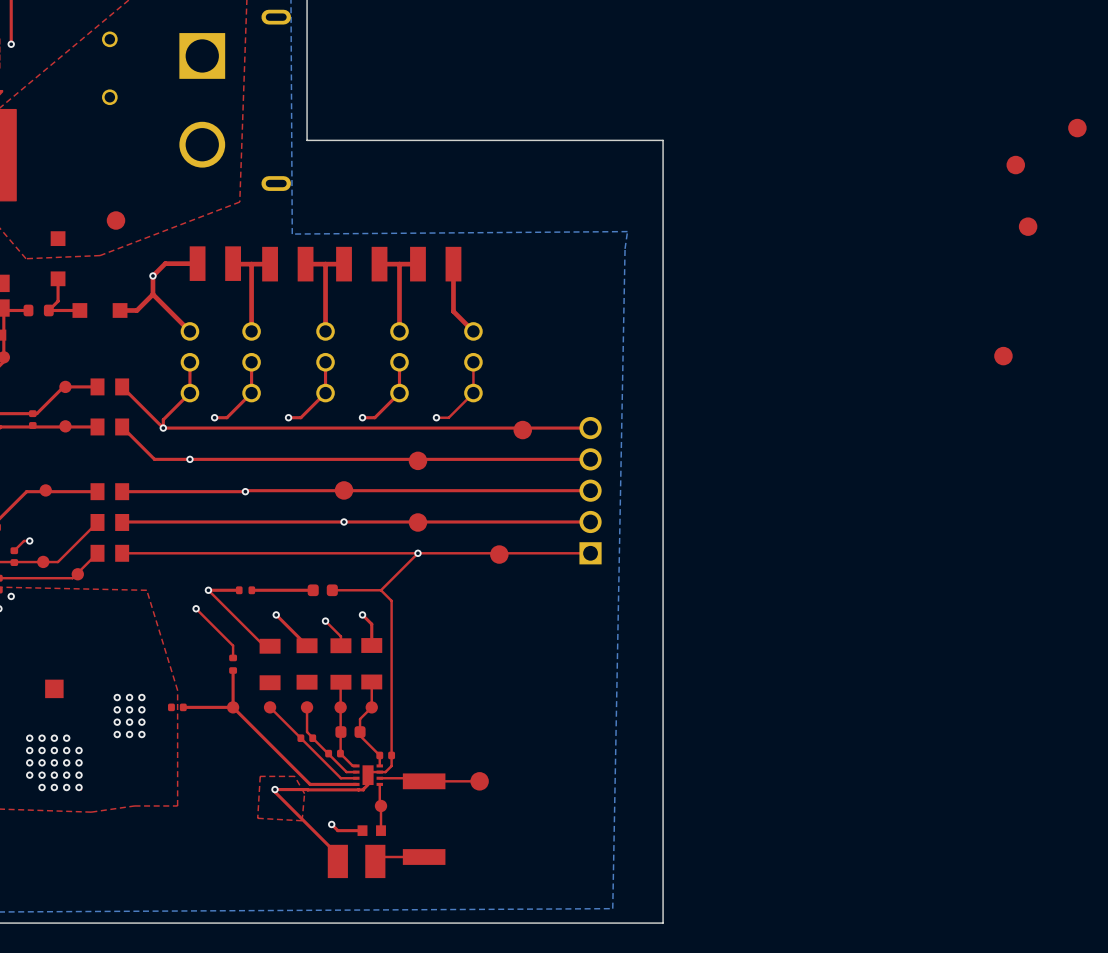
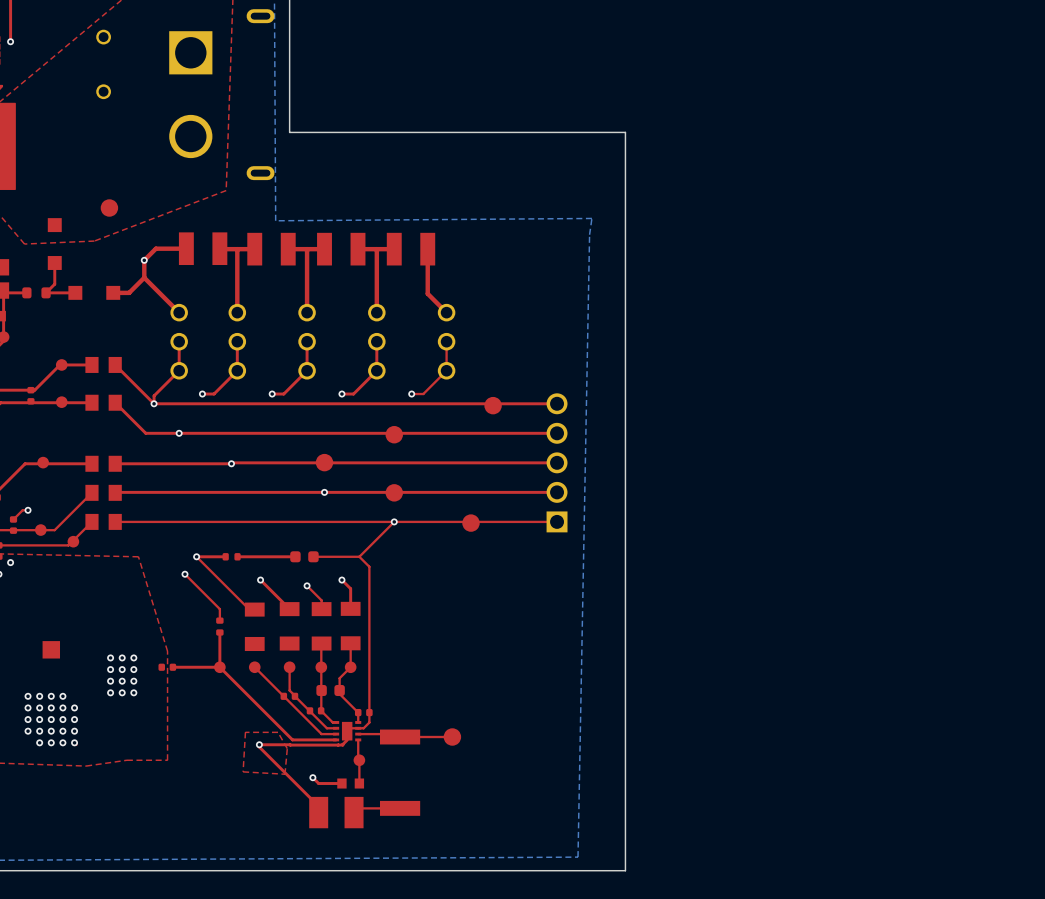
part: (1077, 128) -> none
part: (1015, 165) -> none
part: (1028, 226) -> none
part: (1003, 356) -> none

